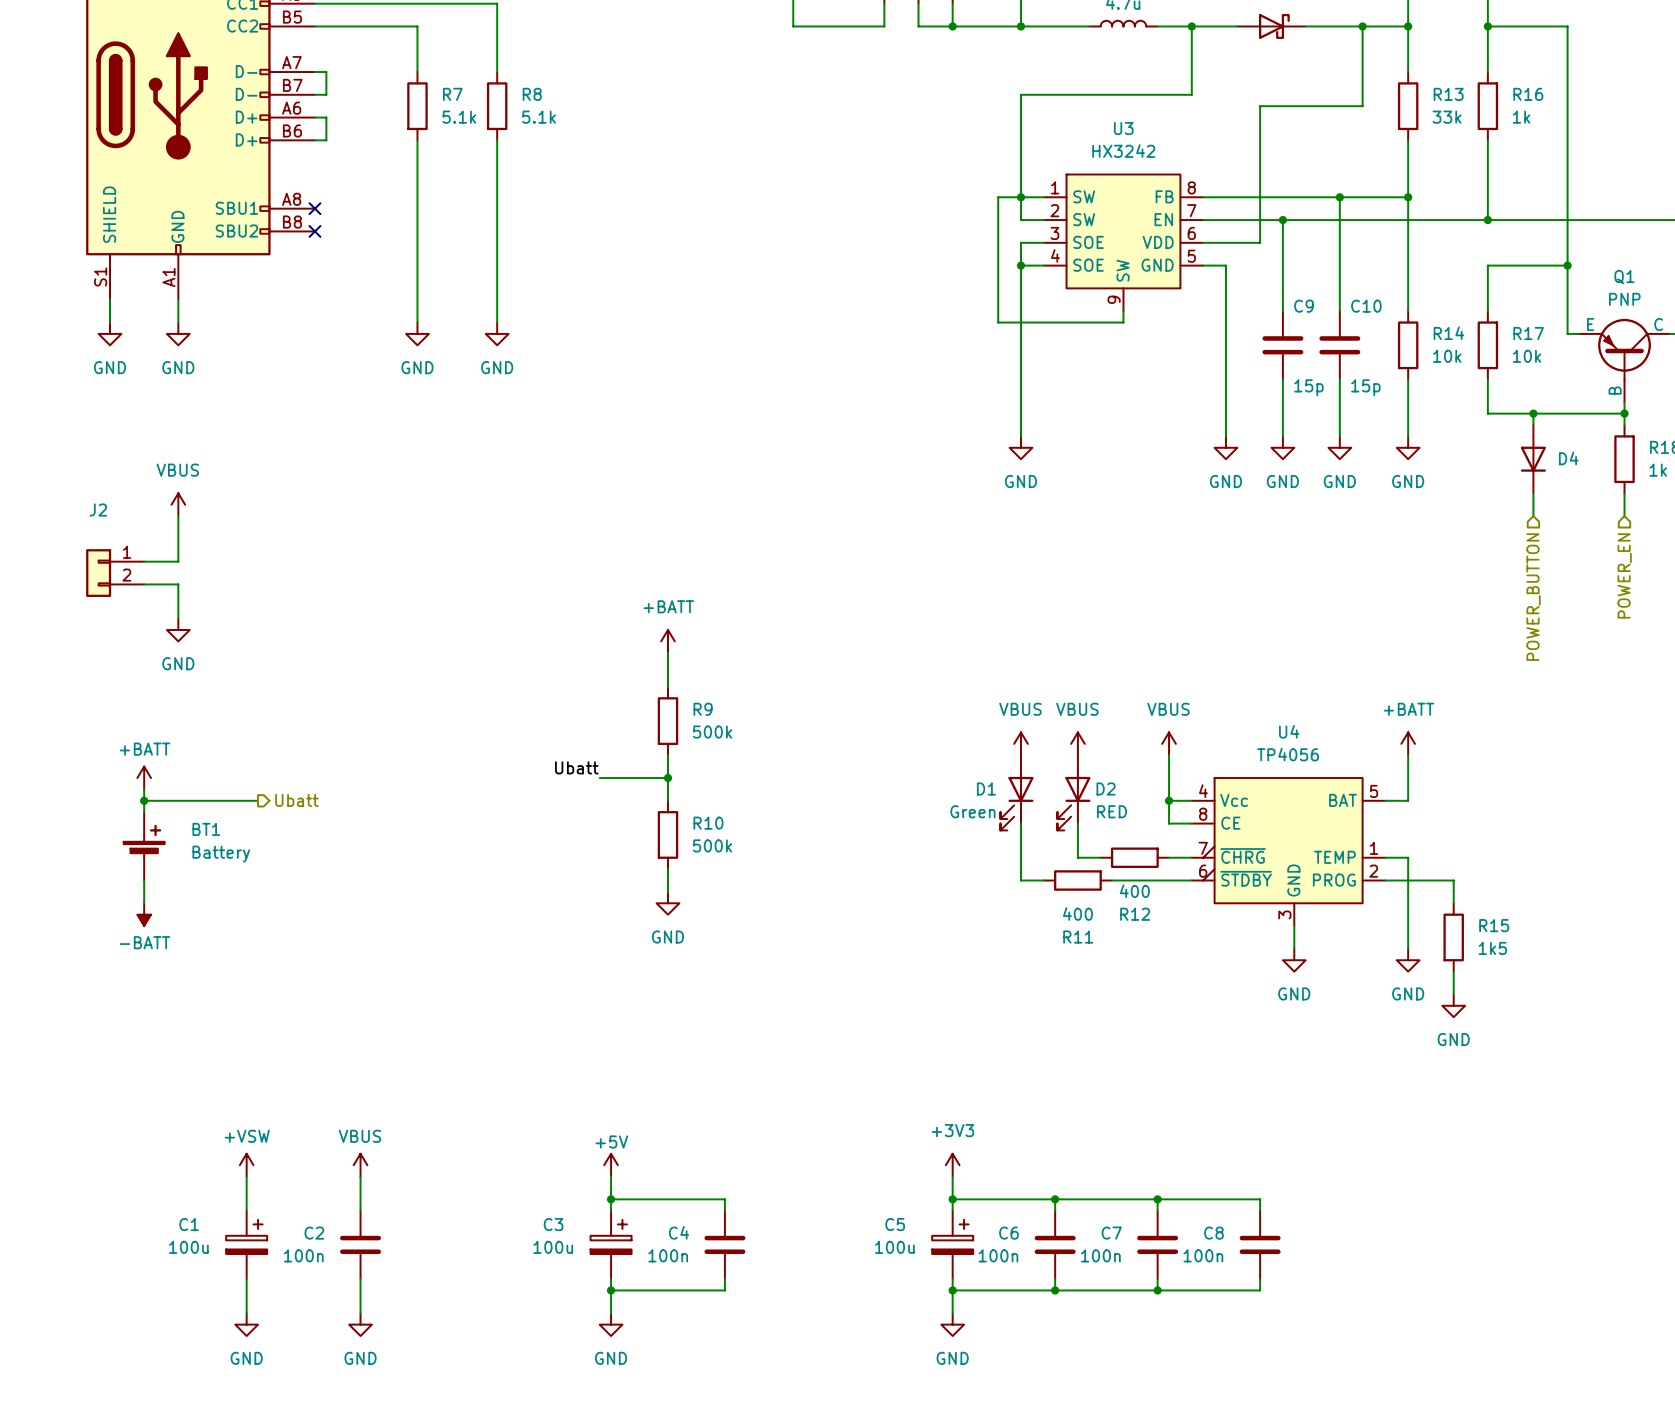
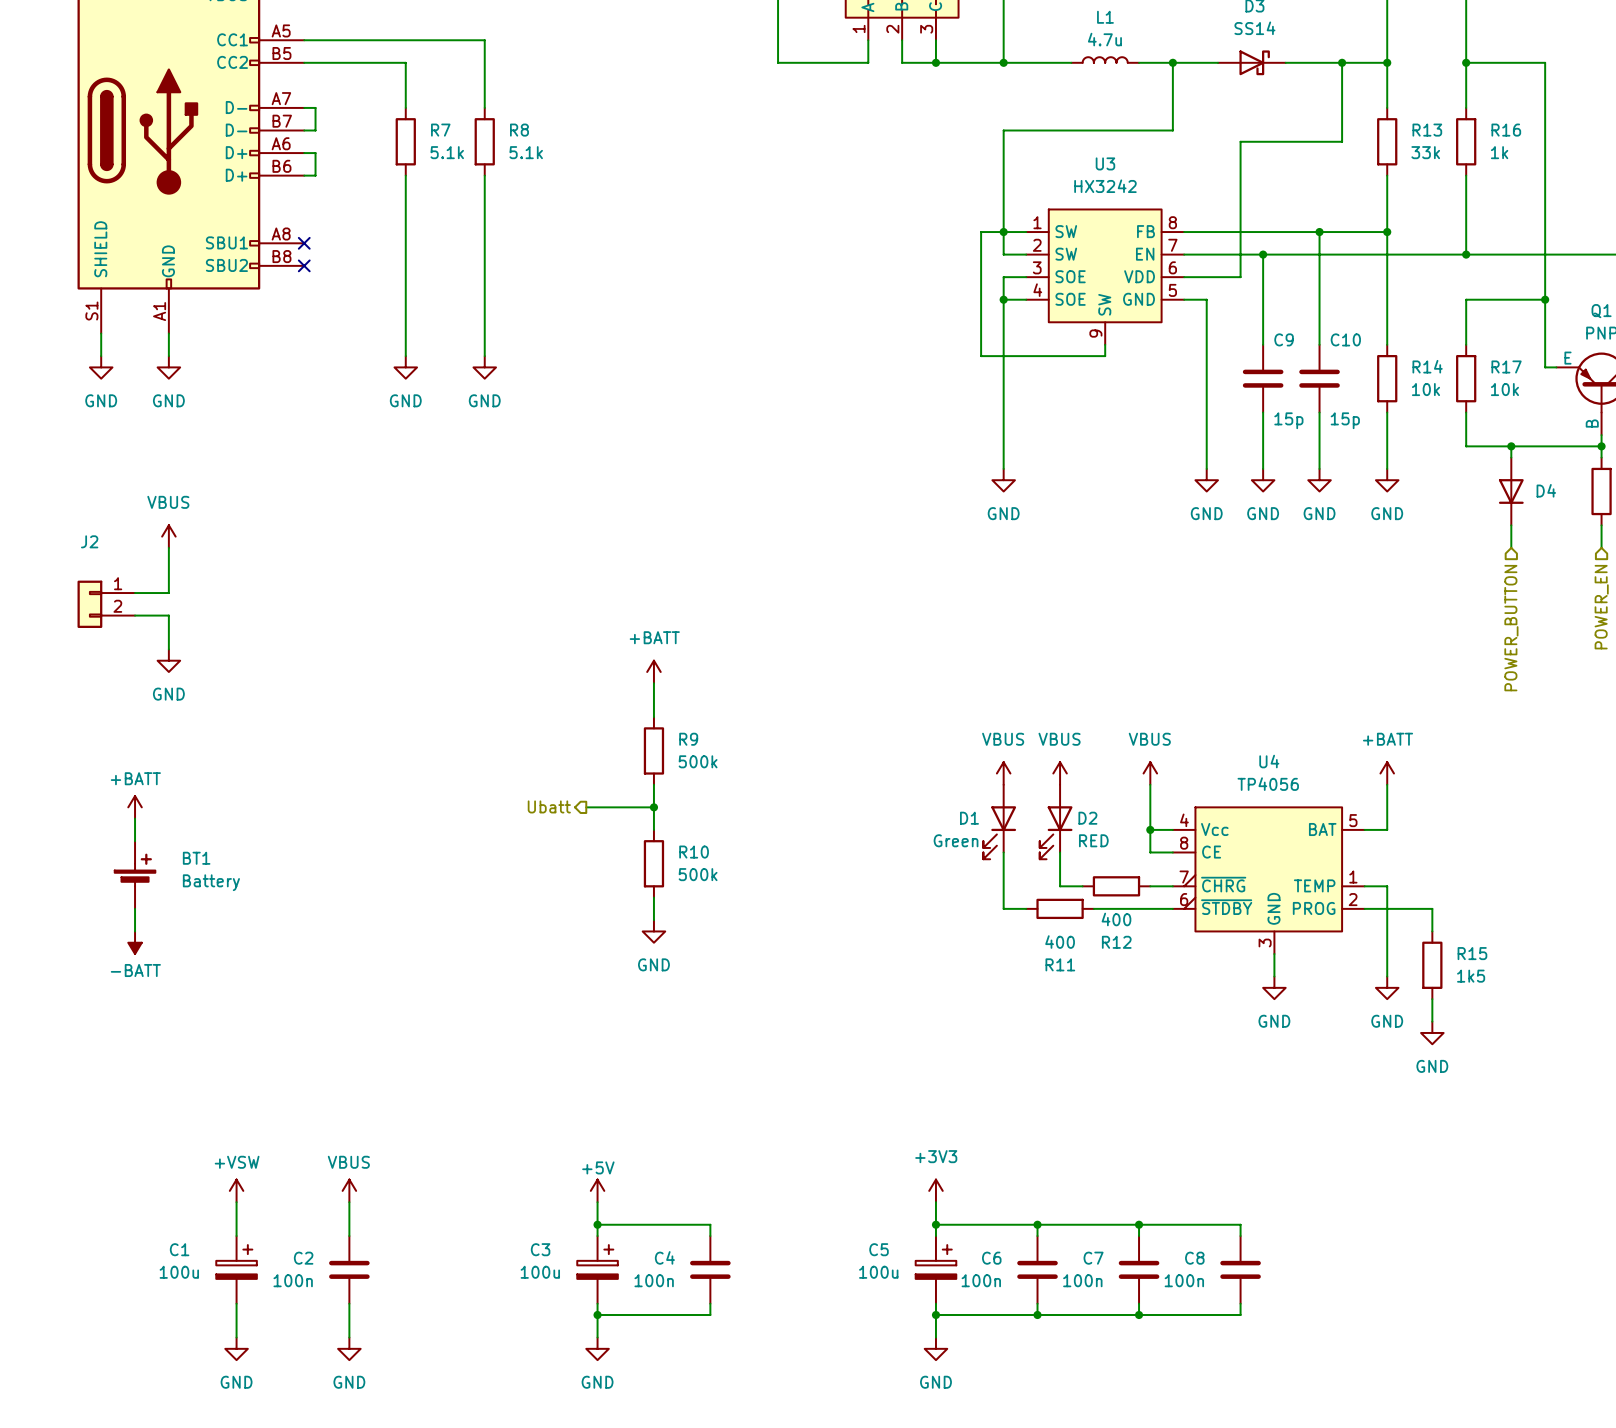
label: Ubatt (576, 767) -> none
hierarchical label: none -> Ubatt (549, 806)
wire: (144, 800) (258, 800) -> none
junction: (144, 800) -> none
hierarchical label: Ubatt (297, 800) -> none

